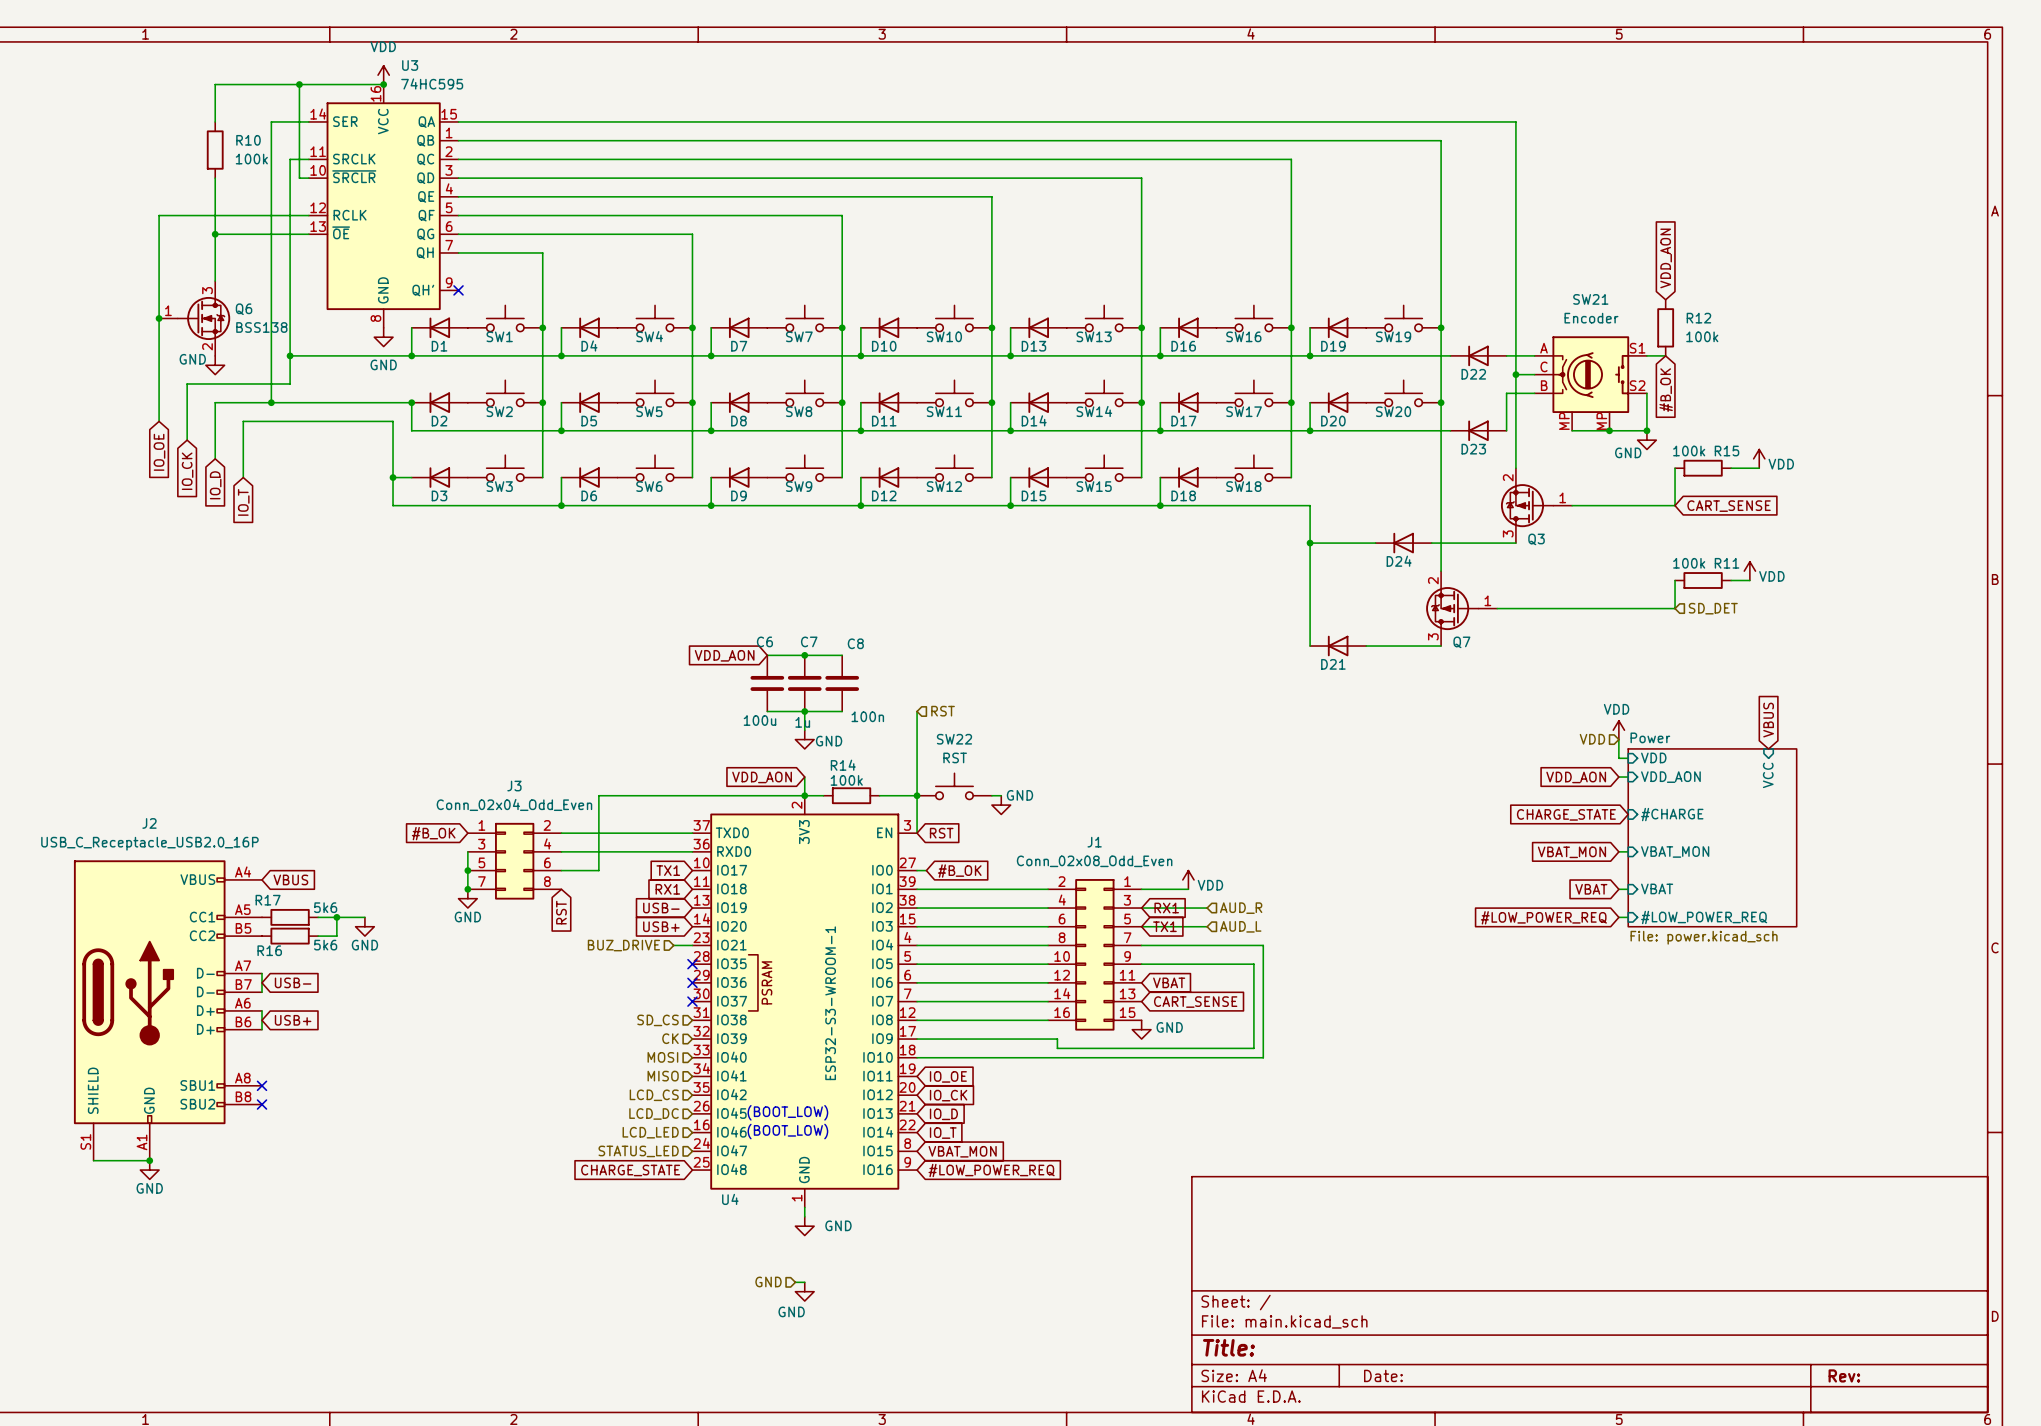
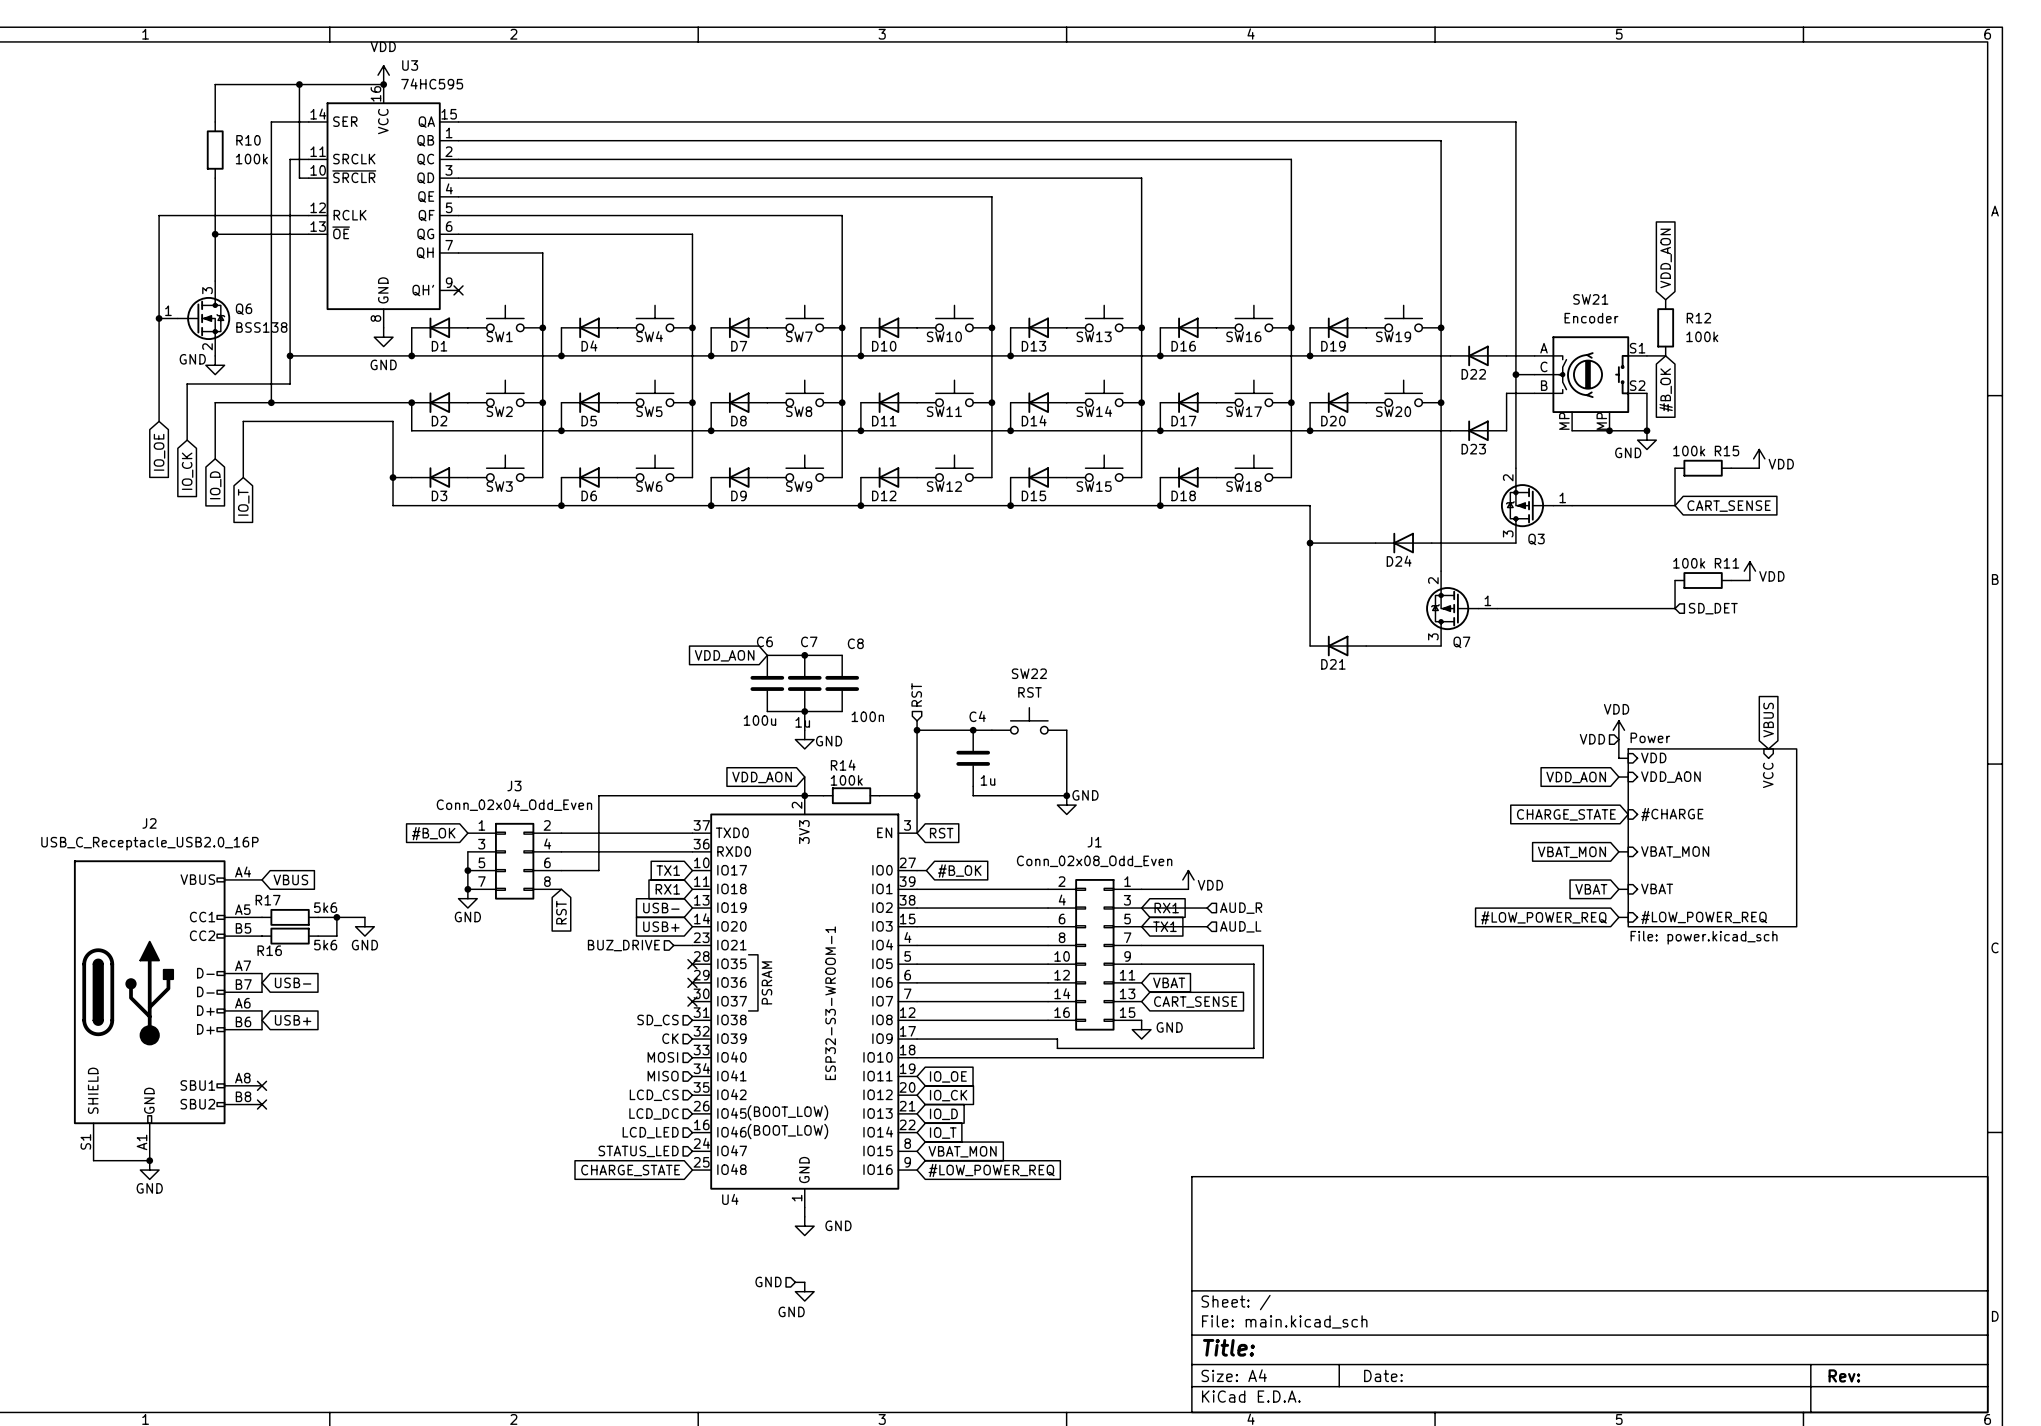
wire: (917, 711) (917, 720) -> none
hierarchical label rotation: 0° (943, 711) -> 90° counterclockwise (916, 694)
hierarchical label position: RST (943, 711) -> RST (916, 694)
wire: none -> (917, 730) (991, 730)
junction: none -> (917, 730)
junction: none -> (973, 730)
wire: none -> (1066, 730) (1066, 795) (1001, 795)
C4: none -> 1u (973, 758)
SW22 position: (954, 786) -> (1029, 720)
junction: none -> (1066, 795)
power symbol position: GND (1001, 805) -> GND (1066, 805)

